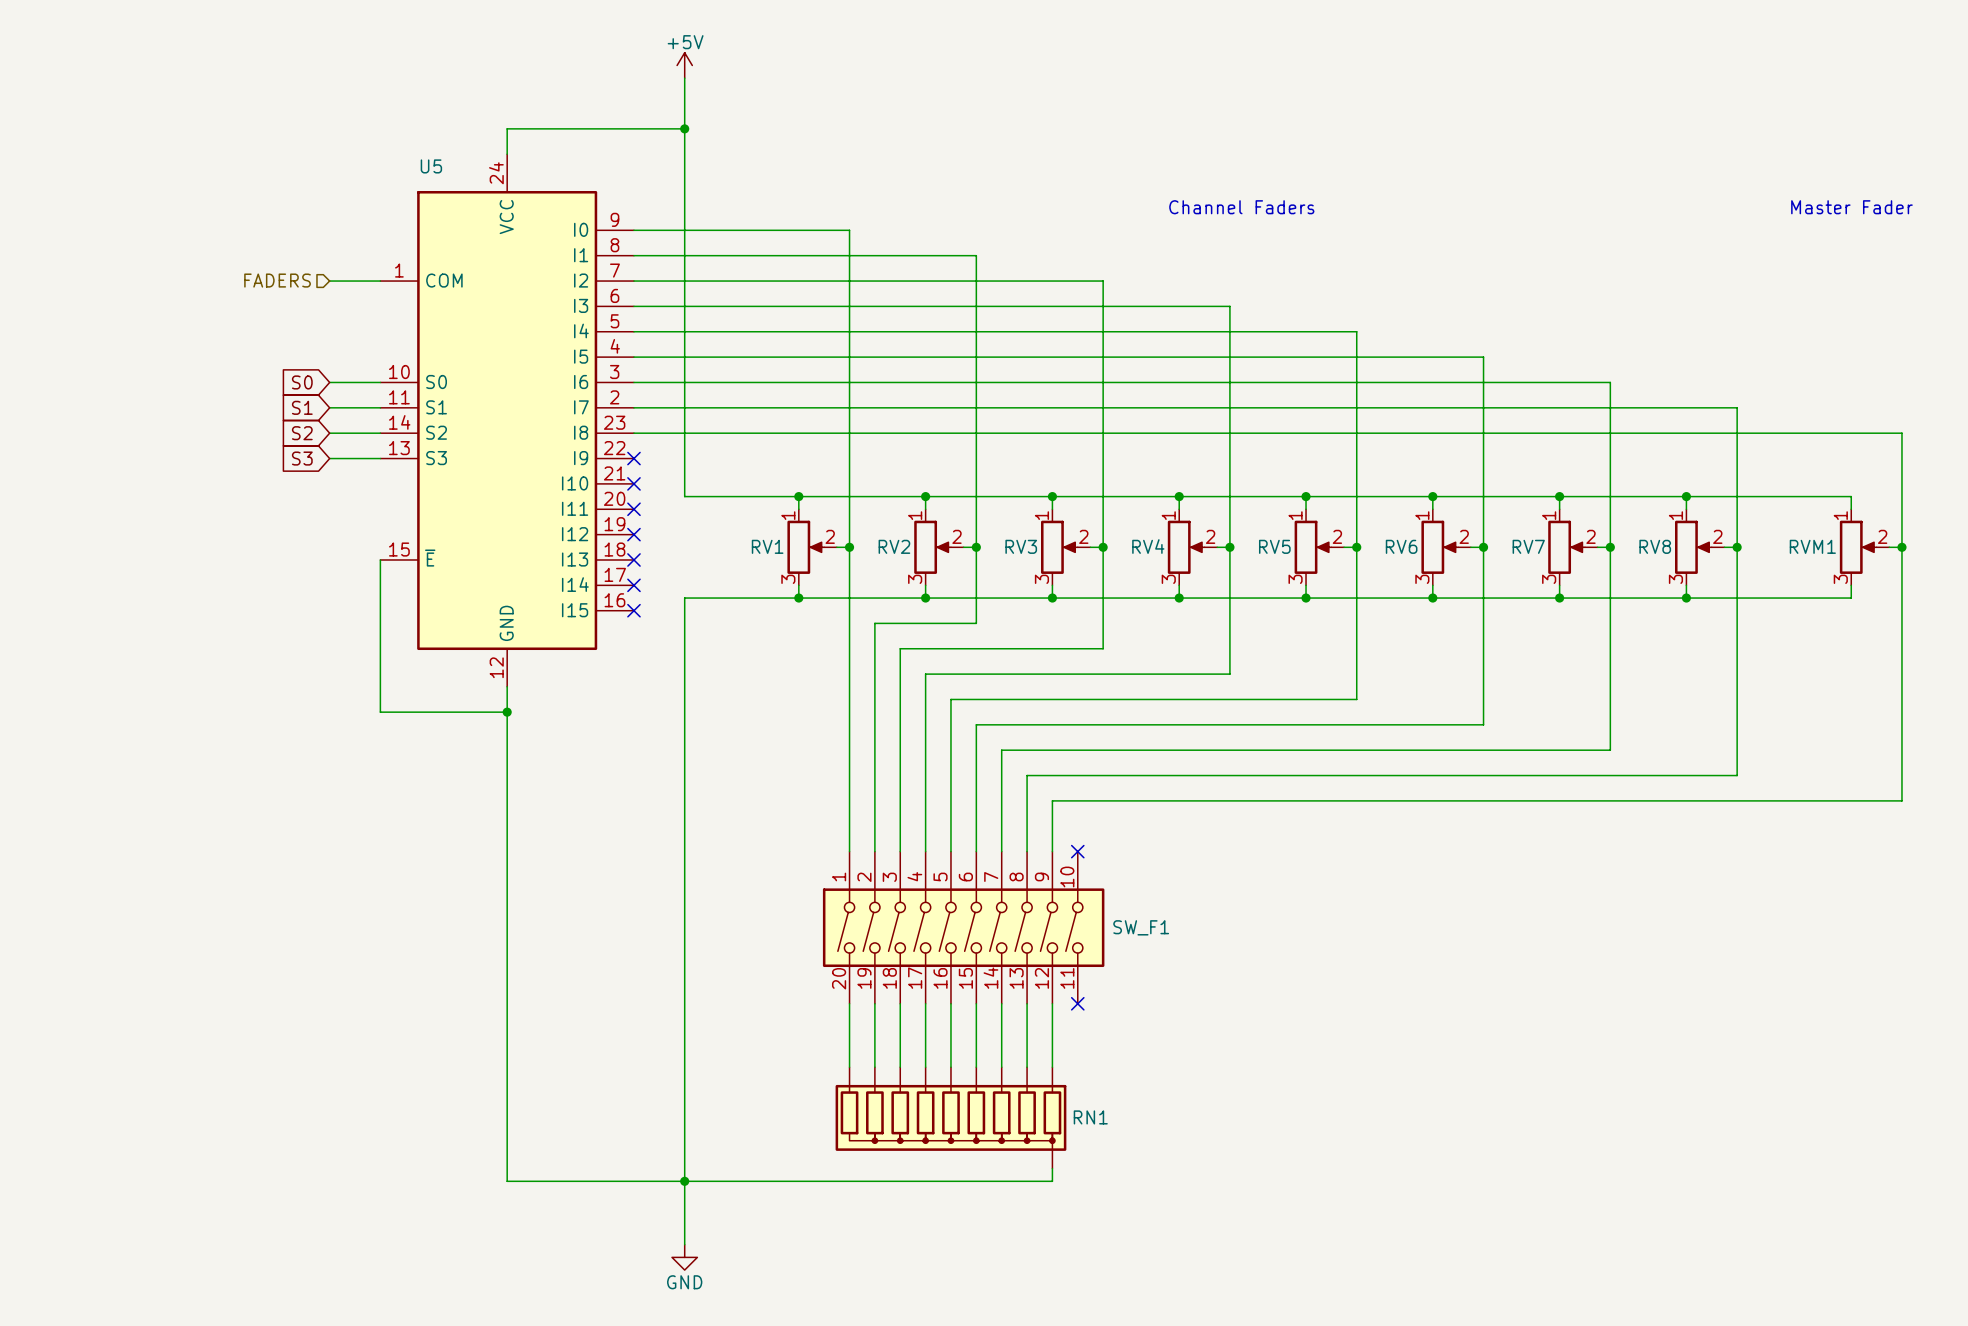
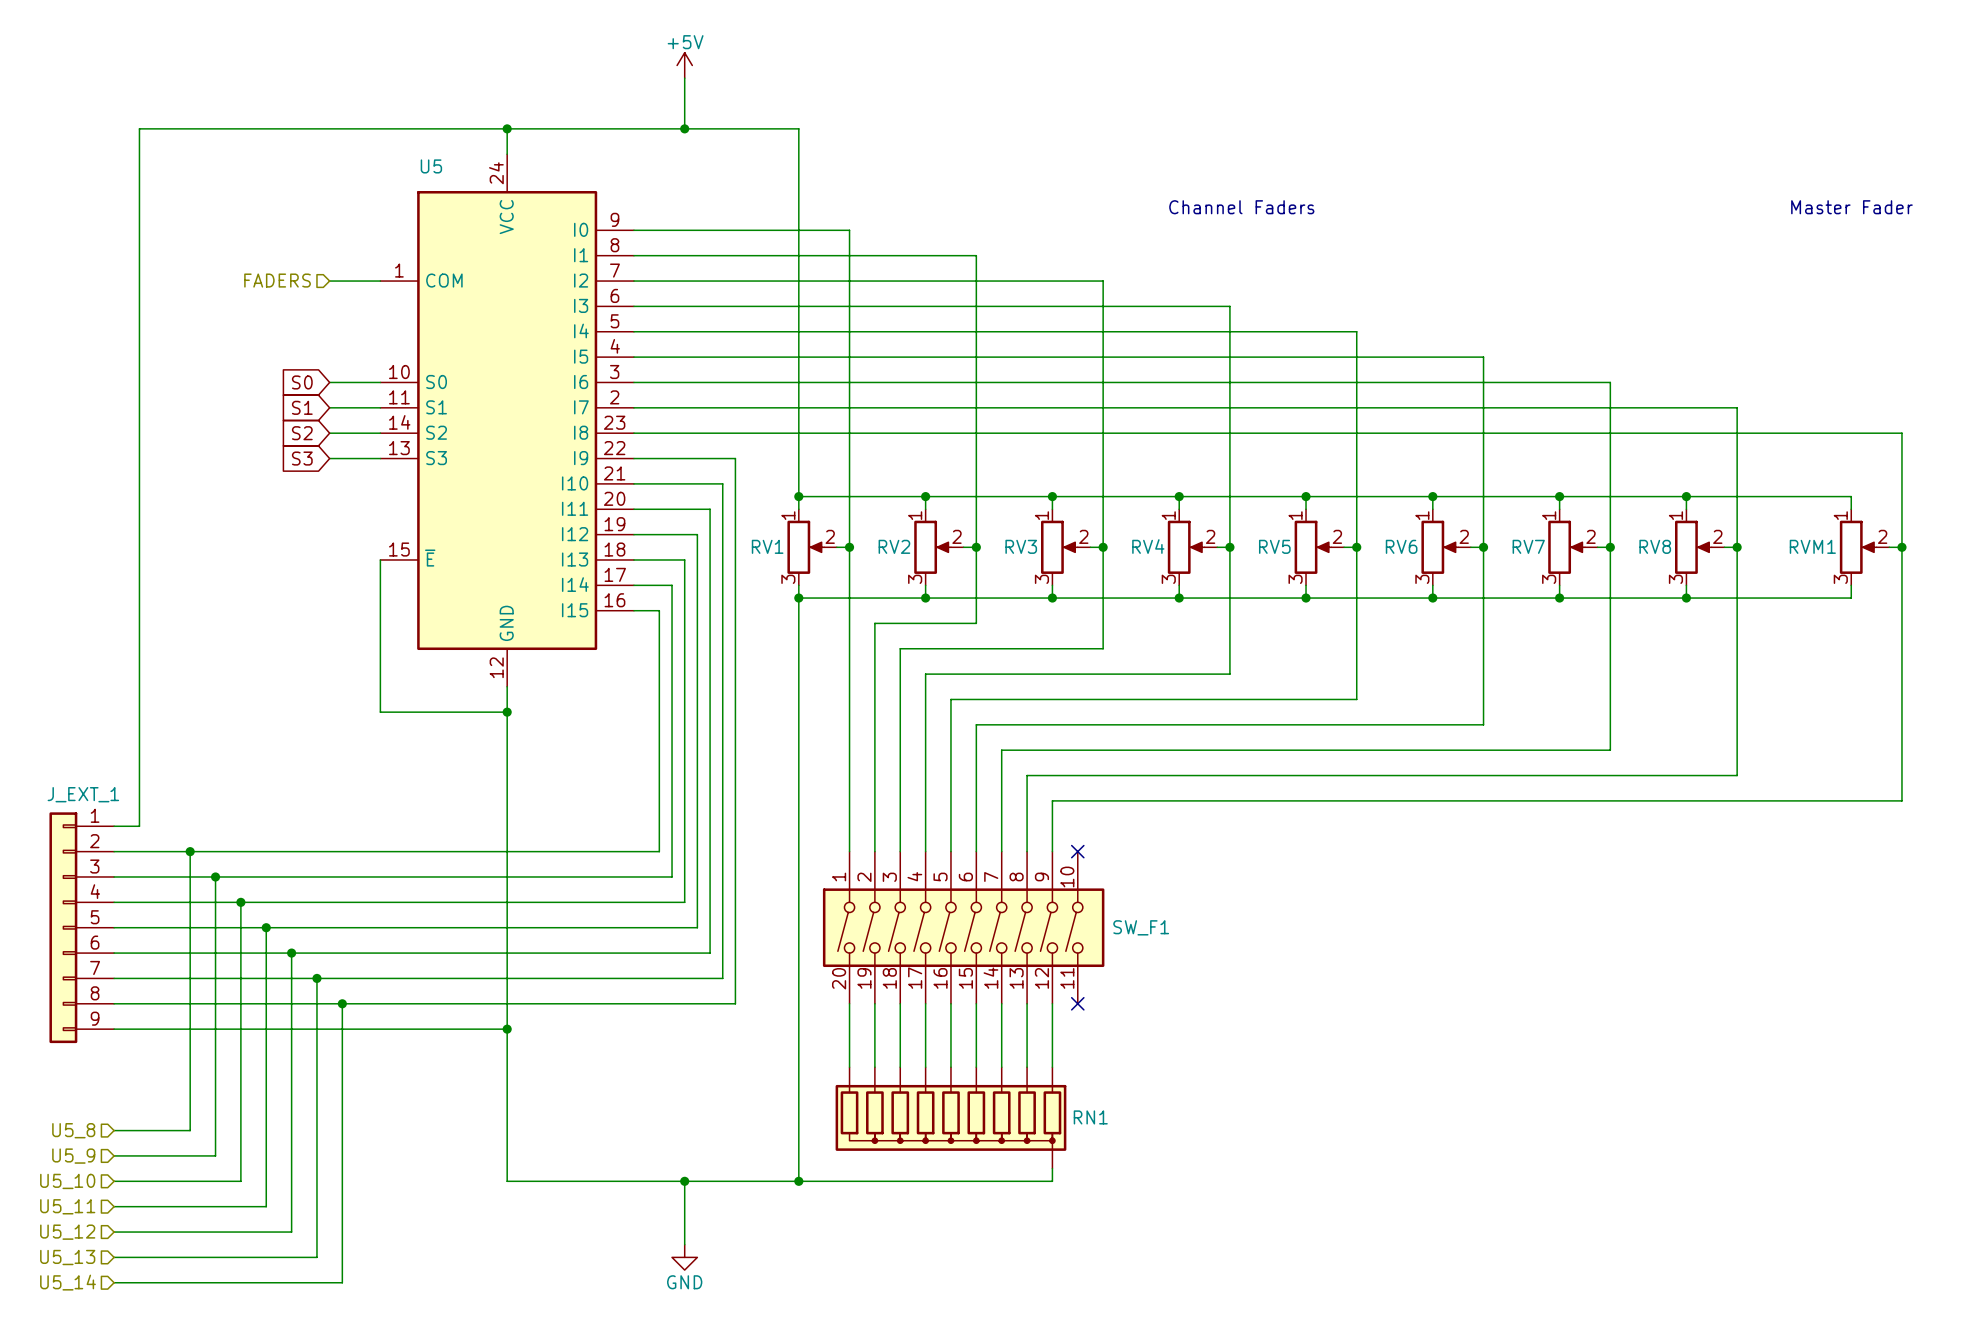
wire: none -> (507, 128) (139, 128) (139, 826) (114, 826)
junction: none -> (507, 128)
wire: (684, 128) (684, 496) (798, 496) -> (684, 128) (798, 128) (798, 496)
wire: none -> (633, 458) (735, 458) (735, 1003) (114, 1003)
no-connect mark: (633, 458) -> none
wire: none -> (633, 483) (722, 483) (722, 978) (114, 978)
no-connect mark: (633, 483) -> none
wire: none -> (633, 509) (710, 509) (710, 953) (114, 953)
no-connect mark: (633, 509) -> none
wire: none -> (633, 534) (697, 534) (697, 927) (114, 927)
no-connect mark: (633, 534) -> none
no-connect mark: (633, 559) -> none
wire: none -> (633, 585) (672, 585) (672, 876) (114, 876)
no-connect mark: (633, 585) -> none
wire: (684, 598) (798, 598) -> (684, 598) (684, 559) (633, 559)
wire: none -> (798, 598) (798, 1181)
wire: none -> (633, 610) (659, 610) (659, 851) (114, 851)
no-connect mark: (633, 610) -> none
wire: none -> (190, 851) (190, 1130) (114, 1130)
junction: none -> (190, 851)
wire: none -> (215, 876) (215, 1155) (114, 1155)
junction: none -> (215, 876)
wire: none -> (240, 902) (240, 1181) (114, 1181)
junction: none -> (240, 902)
wire: (684, 902) (684, 1181) -> (684, 902) (114, 902)
J_EXT_1: none -> (81, 927)
wire: none -> (266, 927) (266, 1206) (114, 1206)
junction: none -> (266, 927)
wire: none -> (291, 953) (291, 1232) (114, 1232)
junction: none -> (291, 953)
wire: none -> (316, 978) (316, 1257) (114, 1257)
junction: none -> (316, 978)
wire: none -> (342, 1003) (342, 1282) (114, 1282)
junction: none -> (342, 1003)
wire: none -> (114, 1029) (507, 1029)
junction: none -> (507, 1029)
hierarchical label: none -> U5_8 (73, 1130)
hierarchical label: none -> U5_9 (73, 1156)
hierarchical label: none -> U5_10 (67, 1181)
junction: none -> (798, 1181)
hierarchical label: none -> U5_11 (67, 1206)
hierarchical label: none -> U5_12 (67, 1232)
hierarchical label: none -> U5_13 (67, 1257)
hierarchical label: none -> U5_14 (68, 1282)

